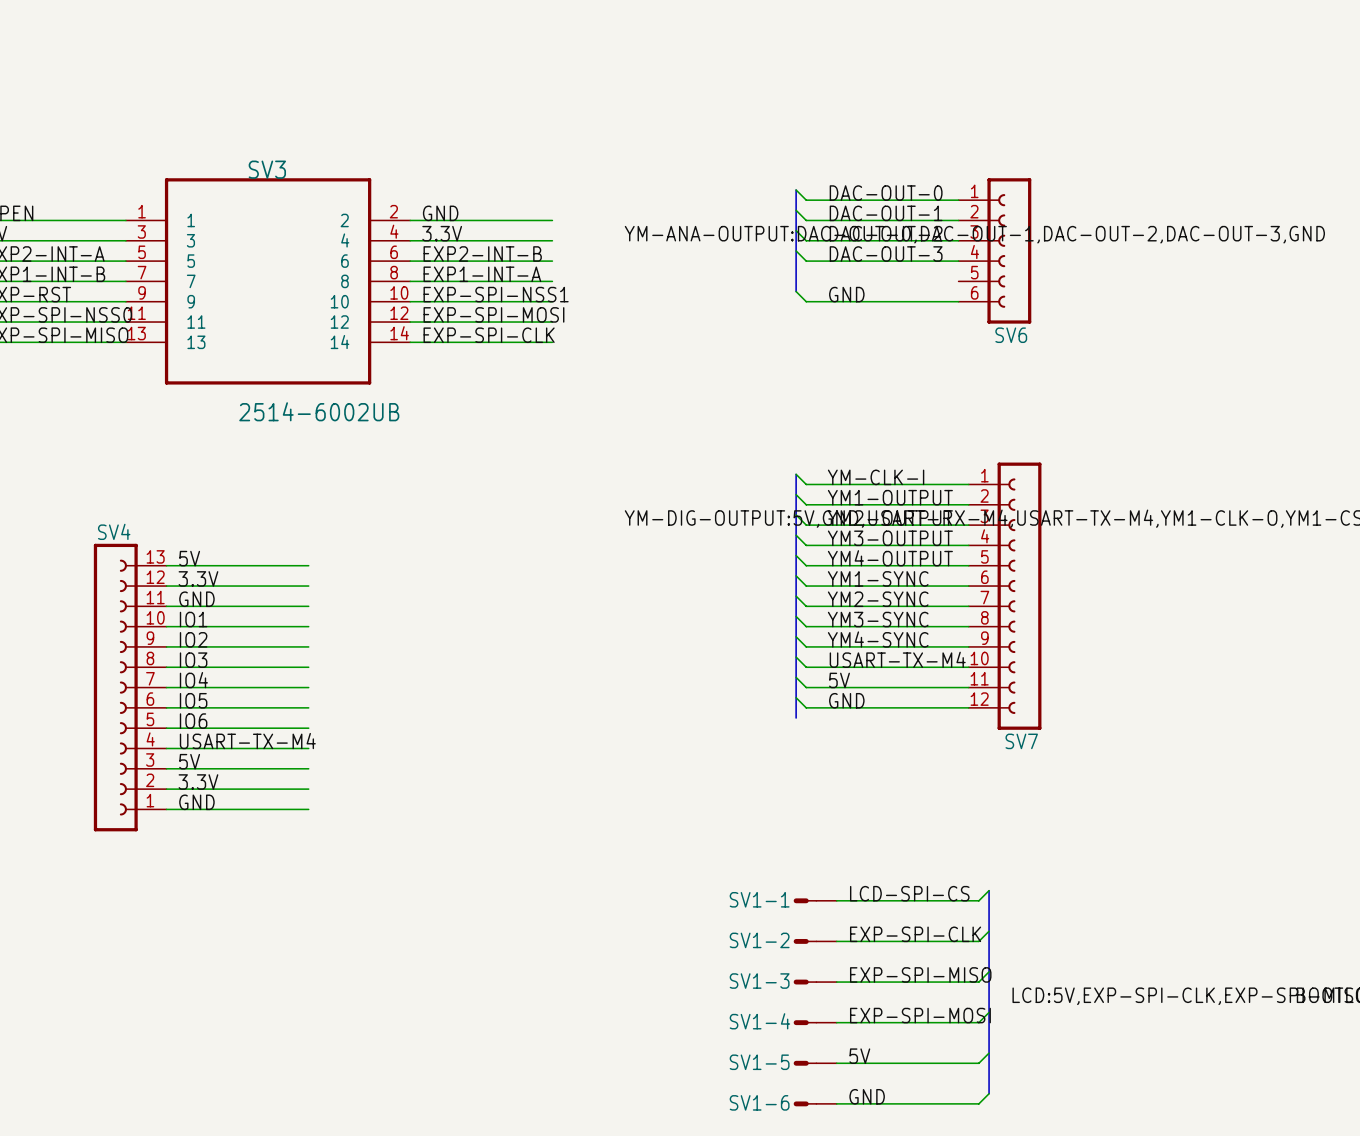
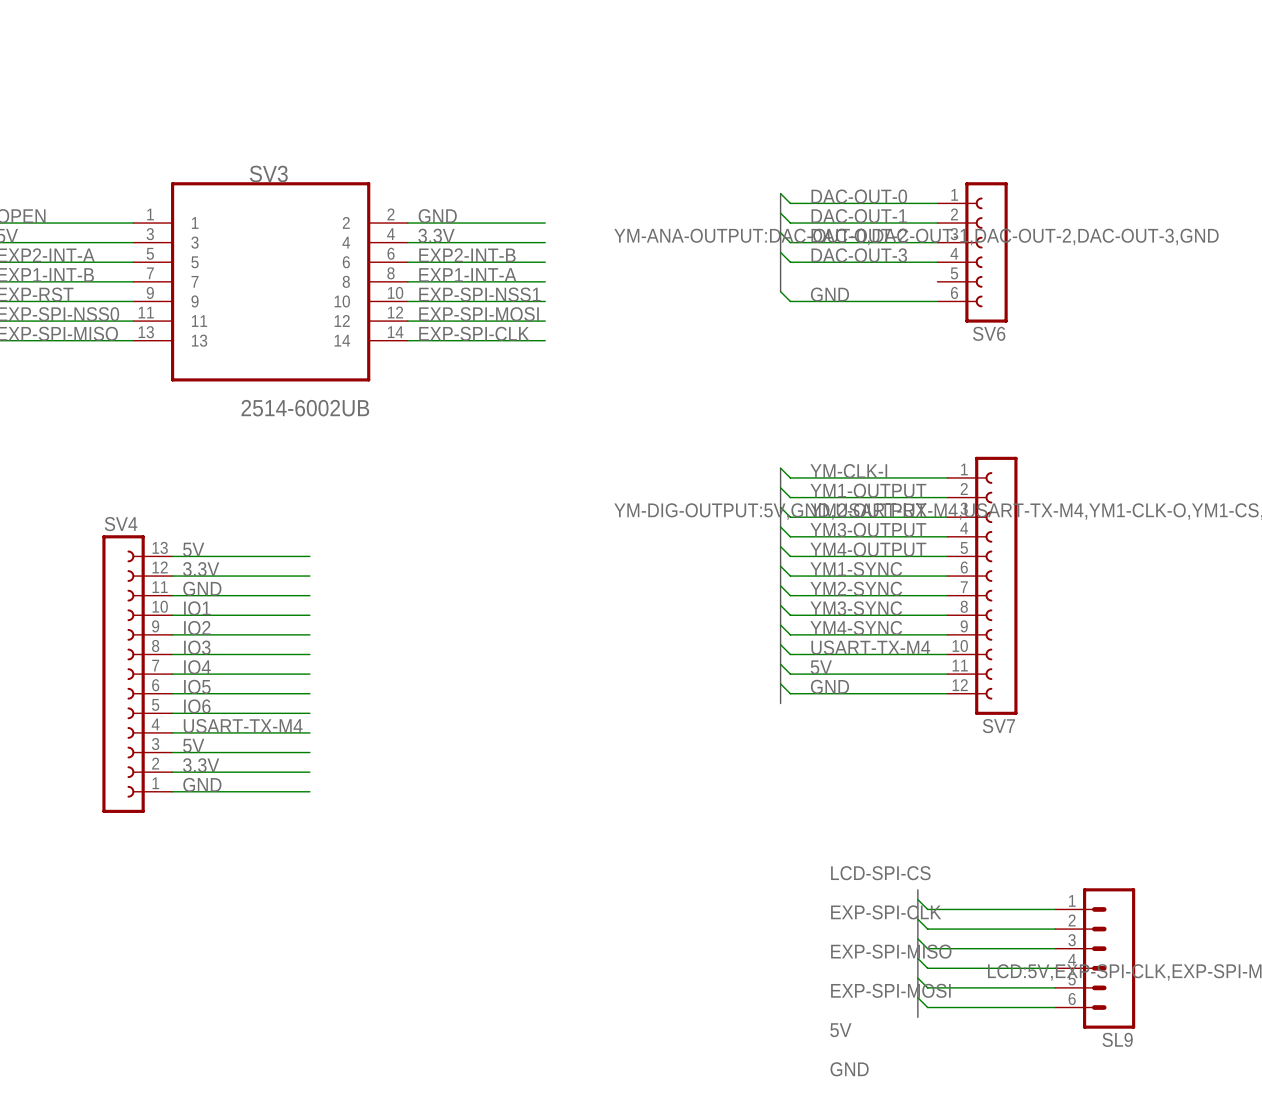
bus: (989, 890) (989, 1093) -> none
wire: (989, 890) (978, 900) (836, 900) -> none
SV1-1: (815, 900) -> none
bus: none -> (917, 889) (917, 1017)
wire: none -> (917, 899) (927, 909) (1055, 909)
wire: (989, 931) (978, 941) (836, 941) -> none
SV1-2: (815, 941) -> none
wire: none -> (917, 919) (927, 929) (1055, 929)
wire: none -> (917, 938) (927, 948) (1055, 948)
wire: (989, 971) (978, 982) (836, 982) -> none
SV1-3: (815, 982) -> none
wire: none -> (917, 958) (927, 968) (1055, 968)
SL9: none -> (1095, 958)
wire: none -> (917, 978) (927, 987) (1055, 987)
wire: (989, 1012) (978, 1022) (836, 1022) -> none
SV1-4: (815, 1022) -> none
wire: none -> (917, 997) (927, 1007) (1055, 1007)
wire: (989, 1053) (978, 1063) (836, 1063) -> none
SV1-5: (815, 1063) -> none
wire: (989, 1093) (978, 1103) (836, 1103) -> none
SV1-6: (815, 1103) -> none

